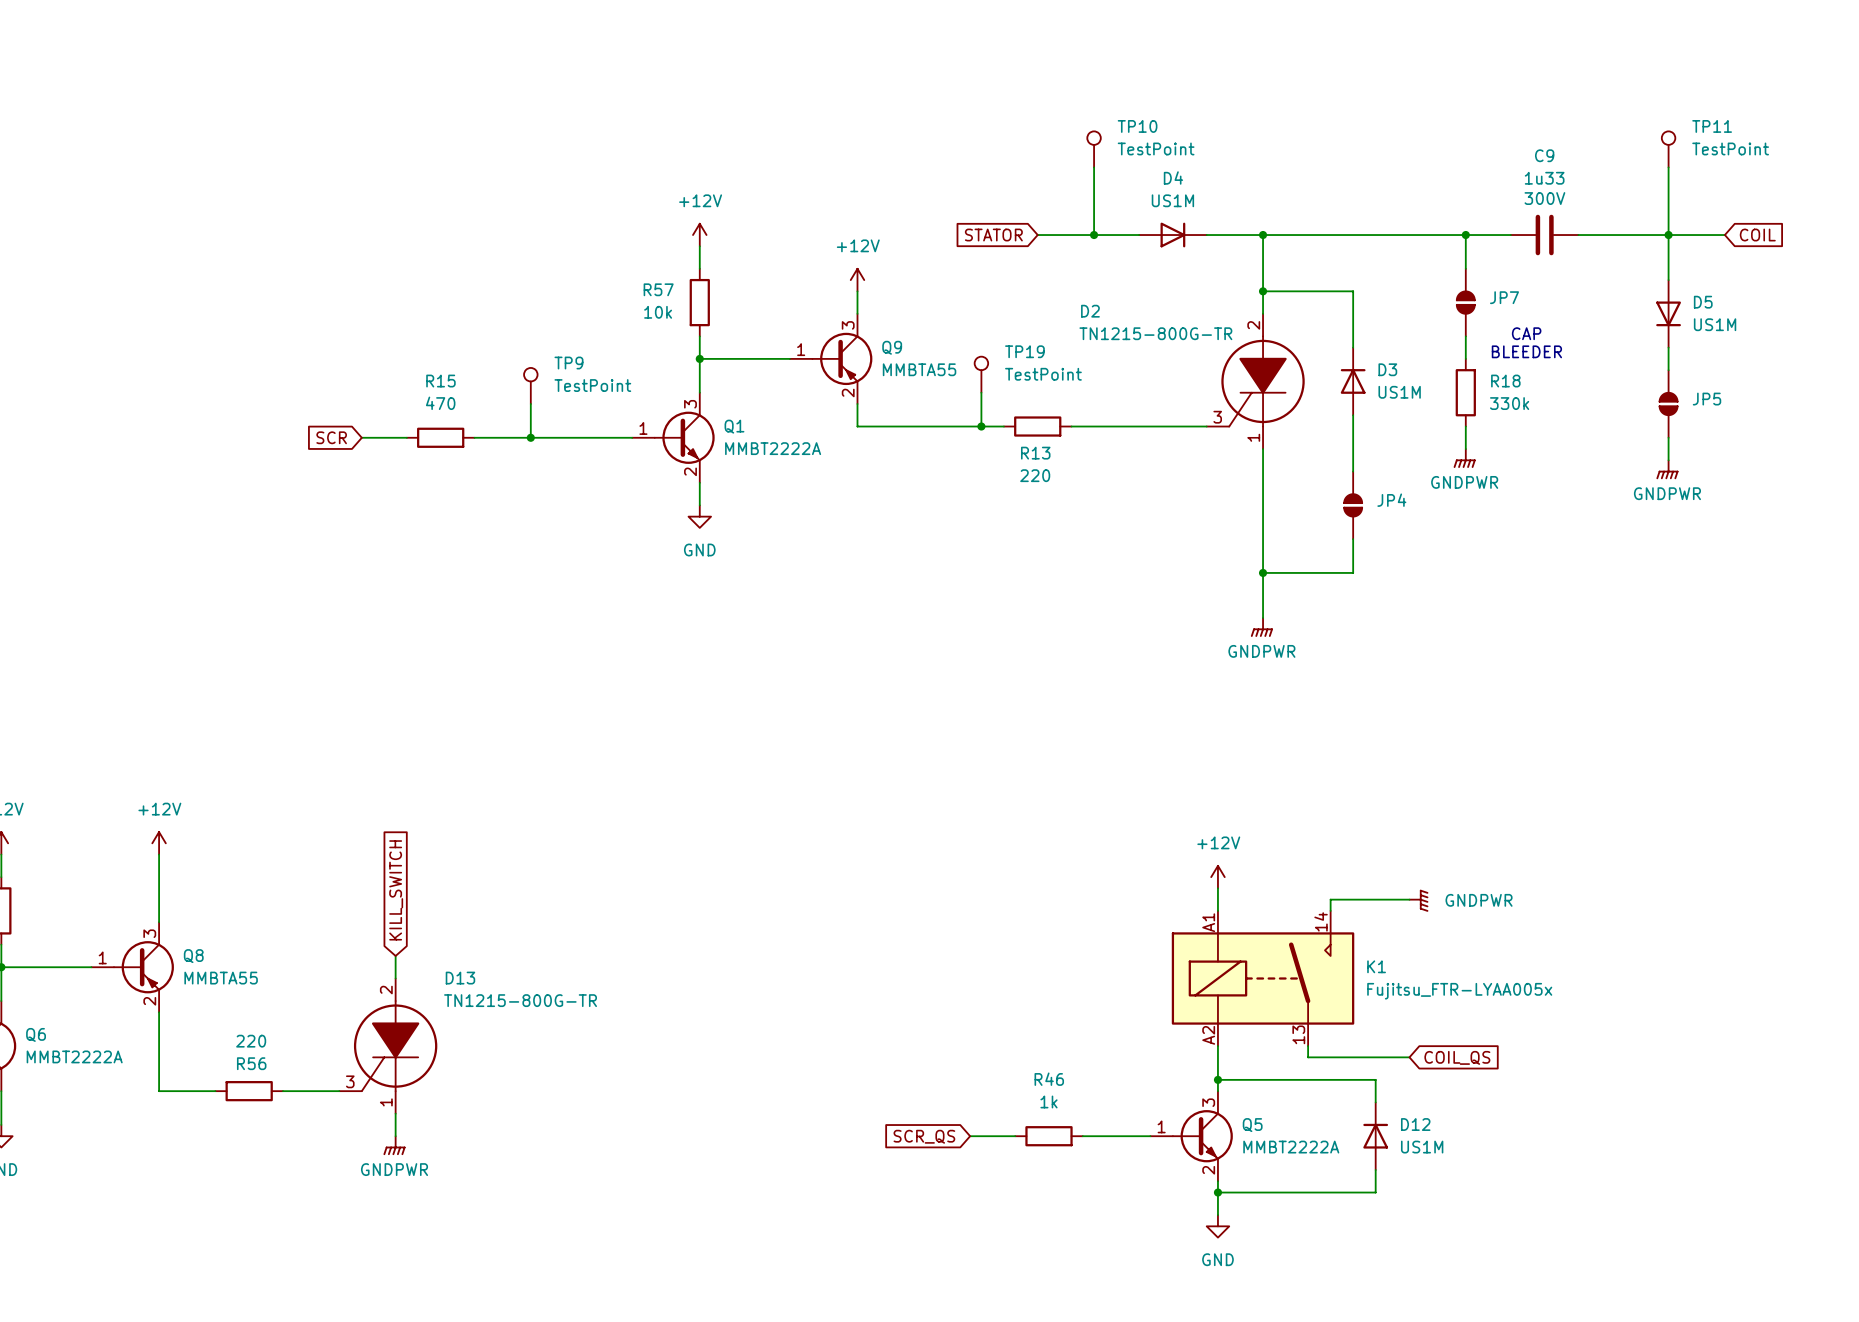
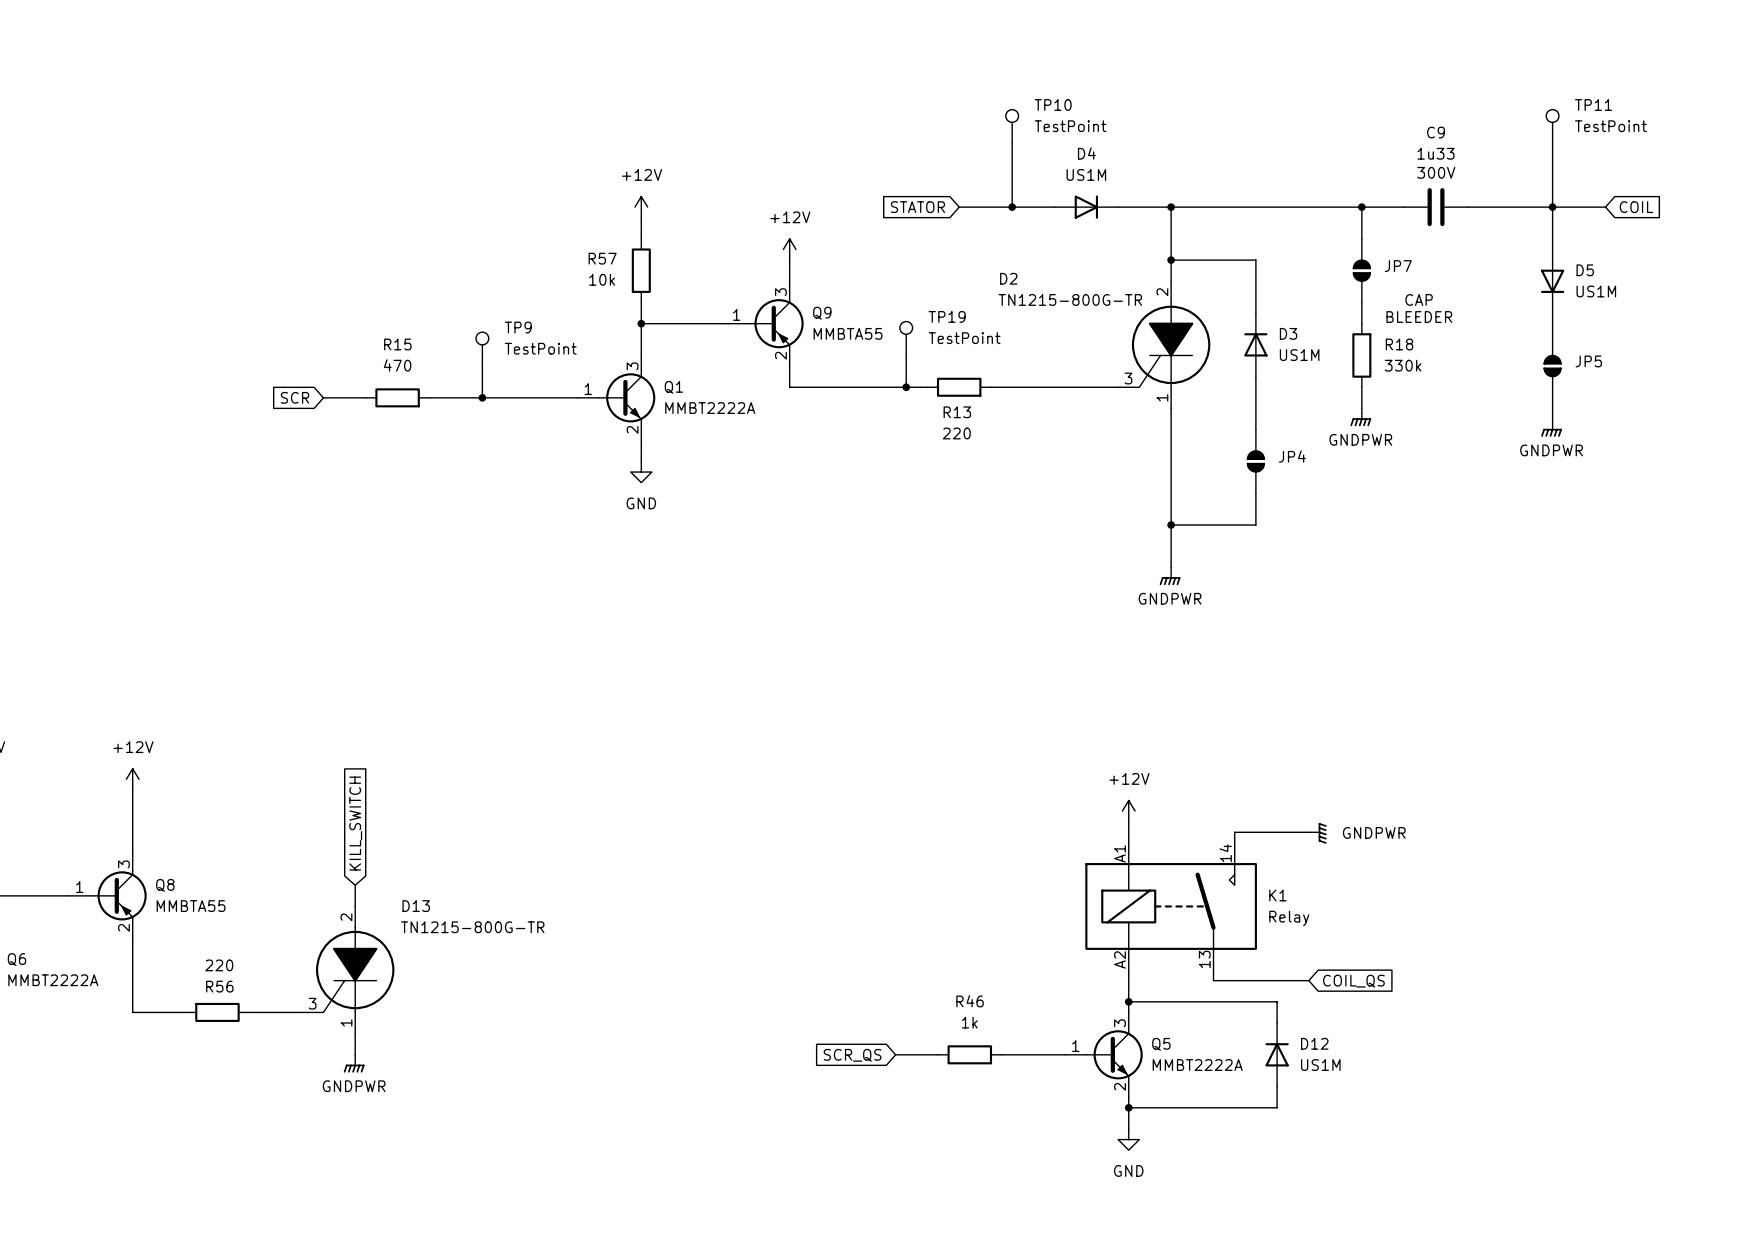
K1 value: Fujitsu_FTR-LYAA005x (1459, 991) -> Relay (1289, 918)

